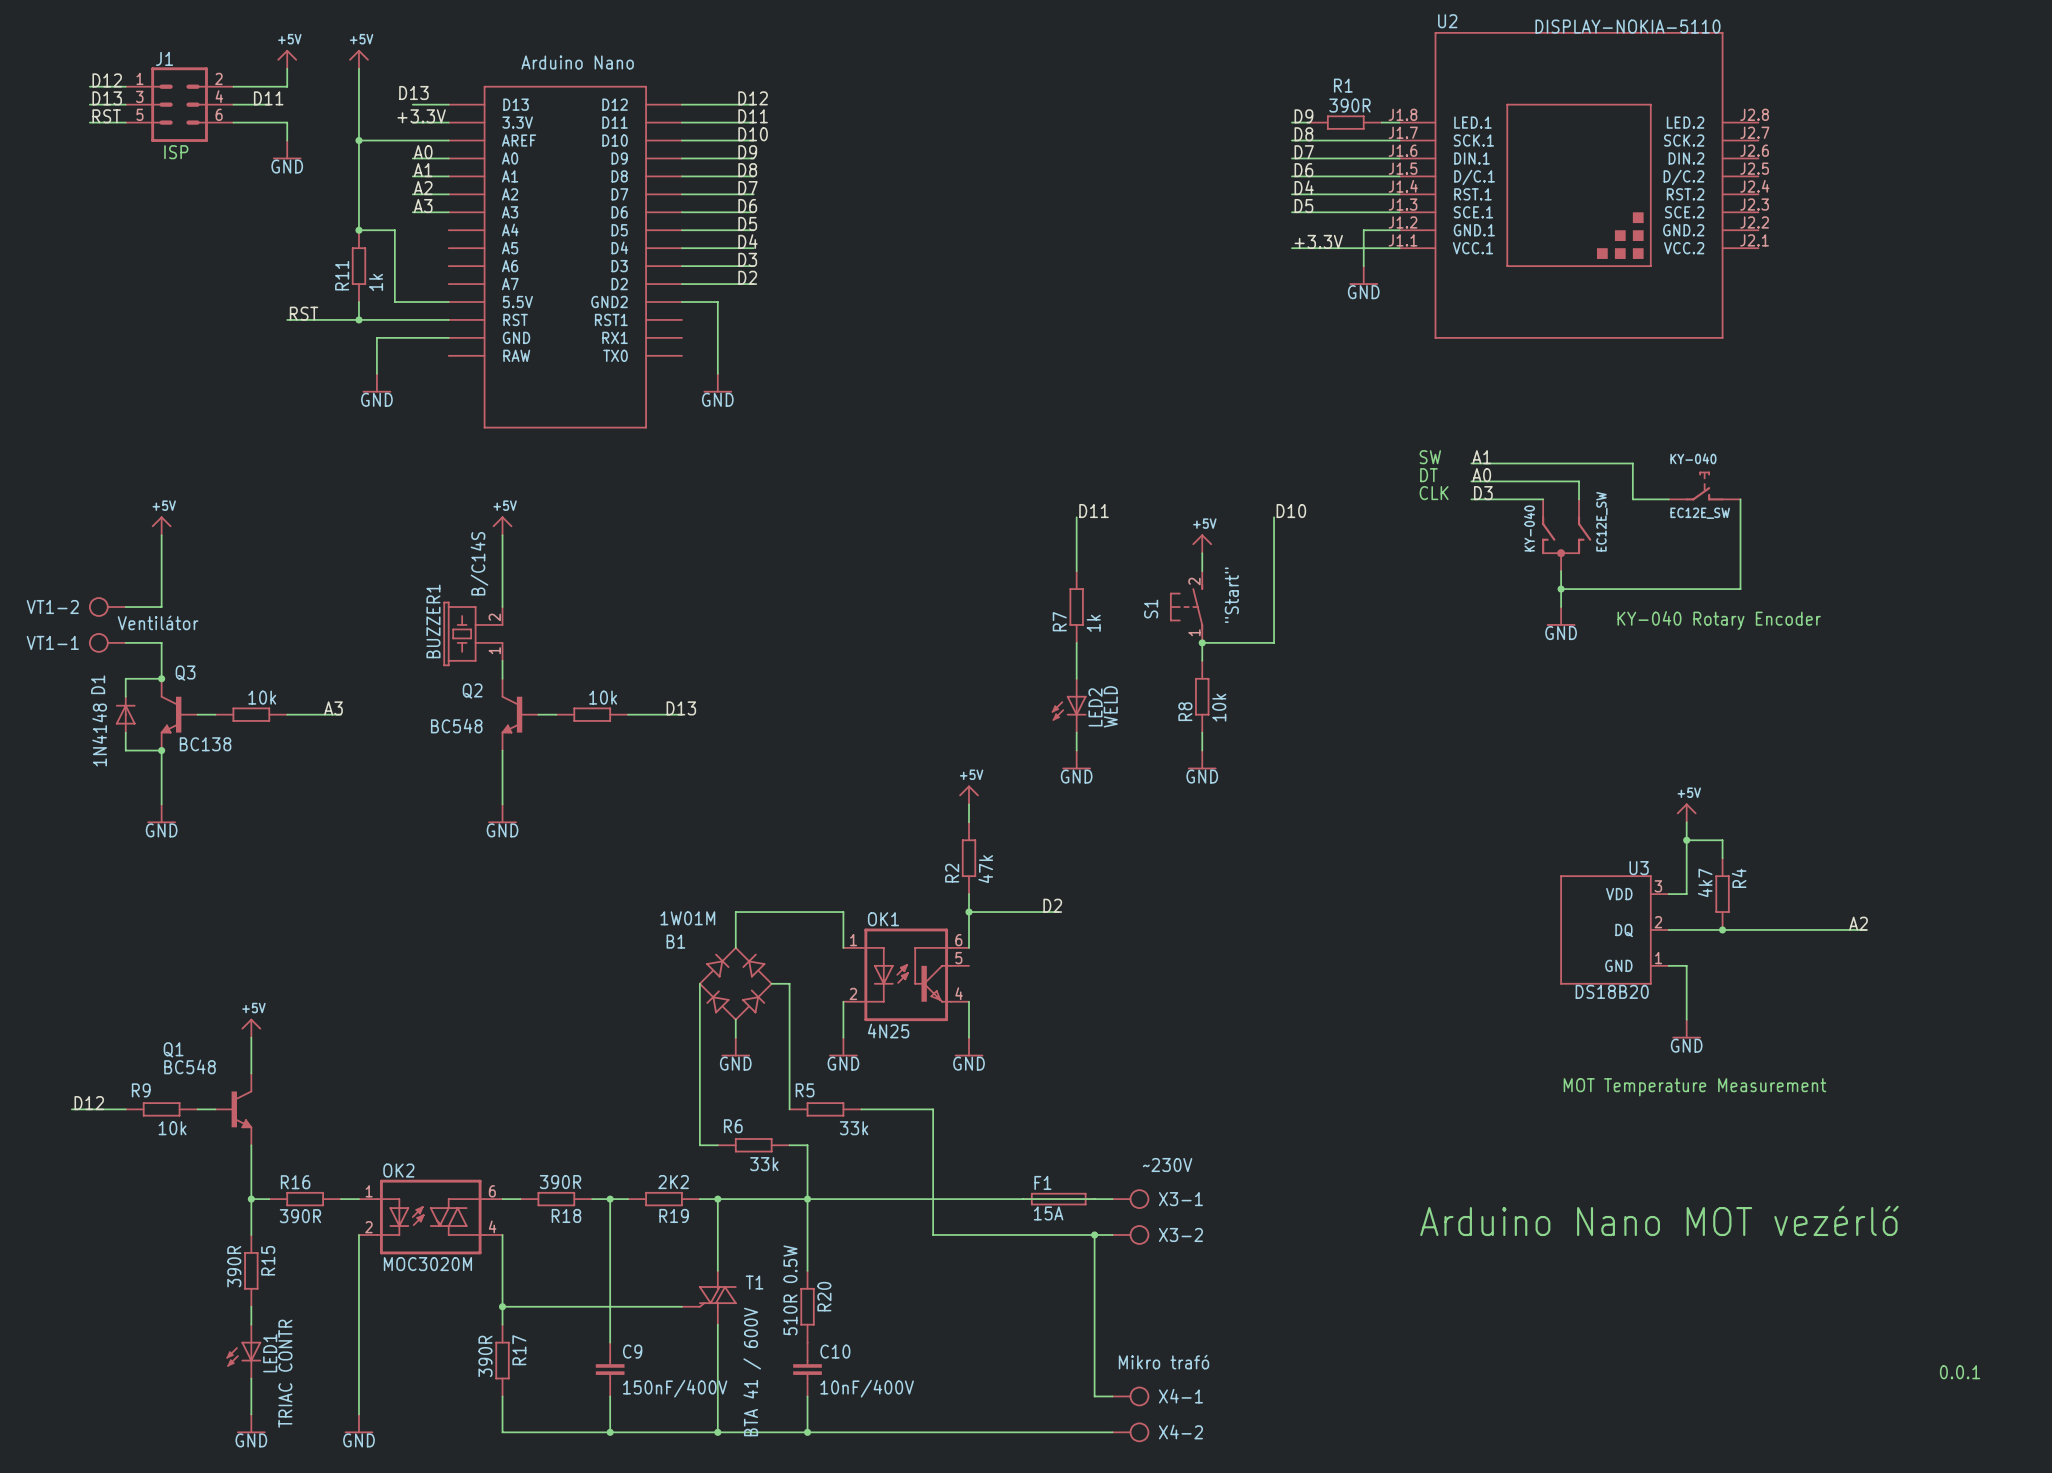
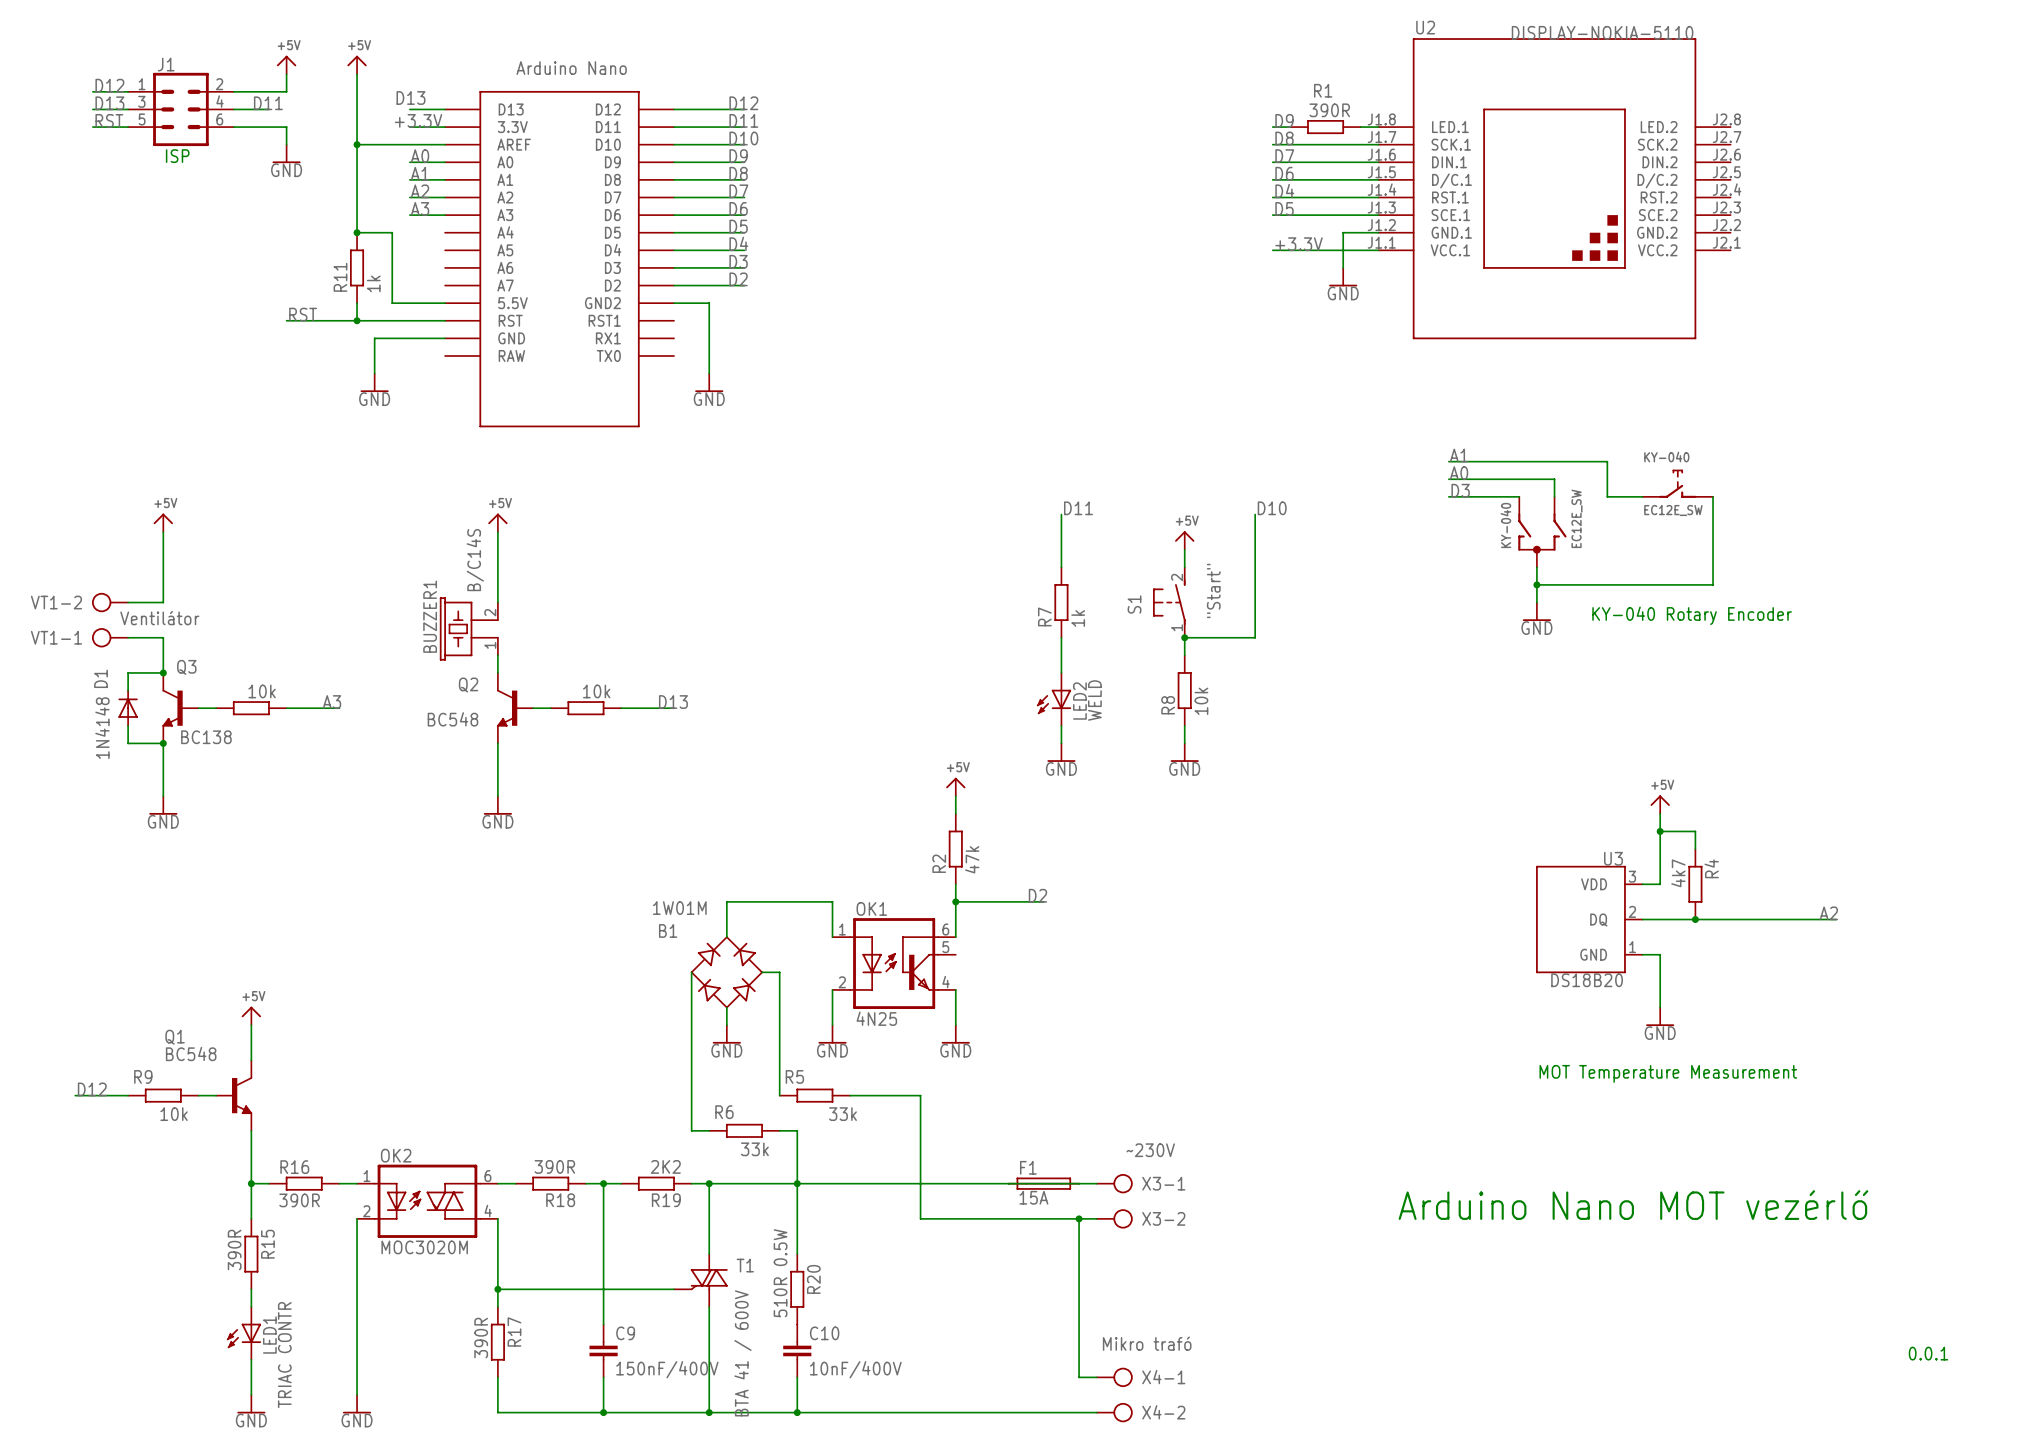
text: SW (1430, 457) -> none
text: DT (1428, 475) -> none
text: CLK (1434, 493) -> none

